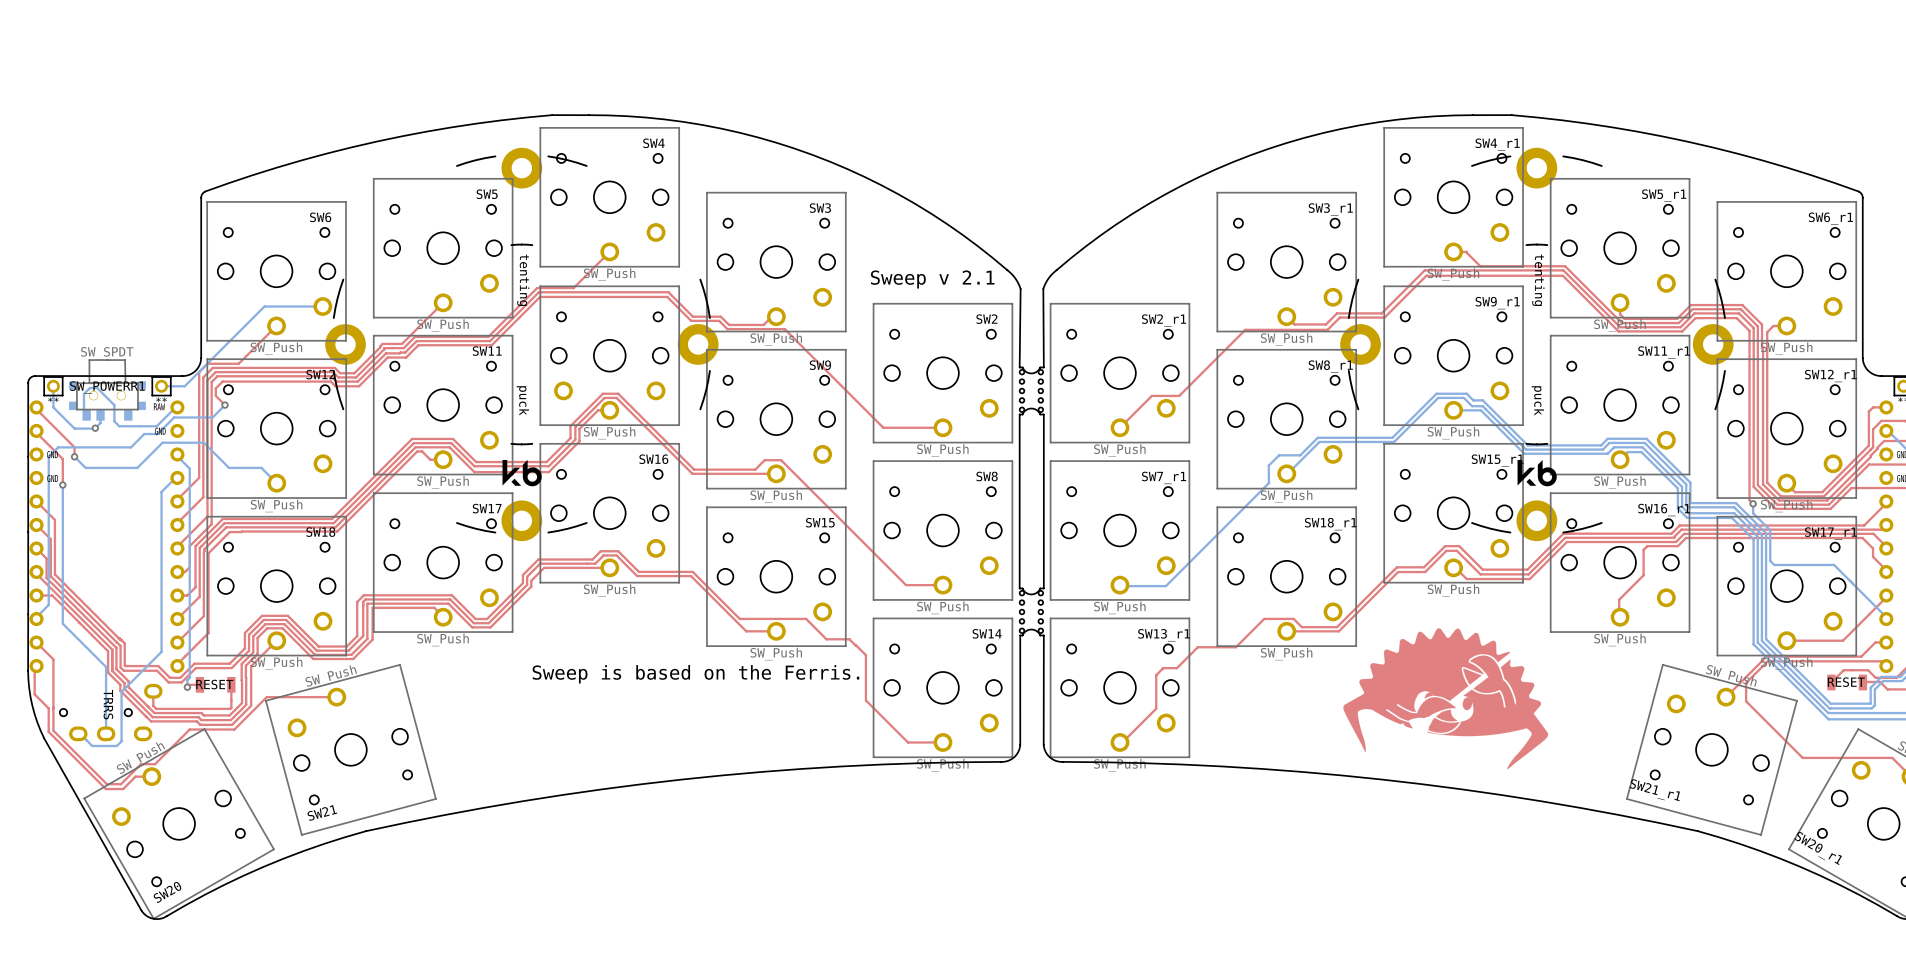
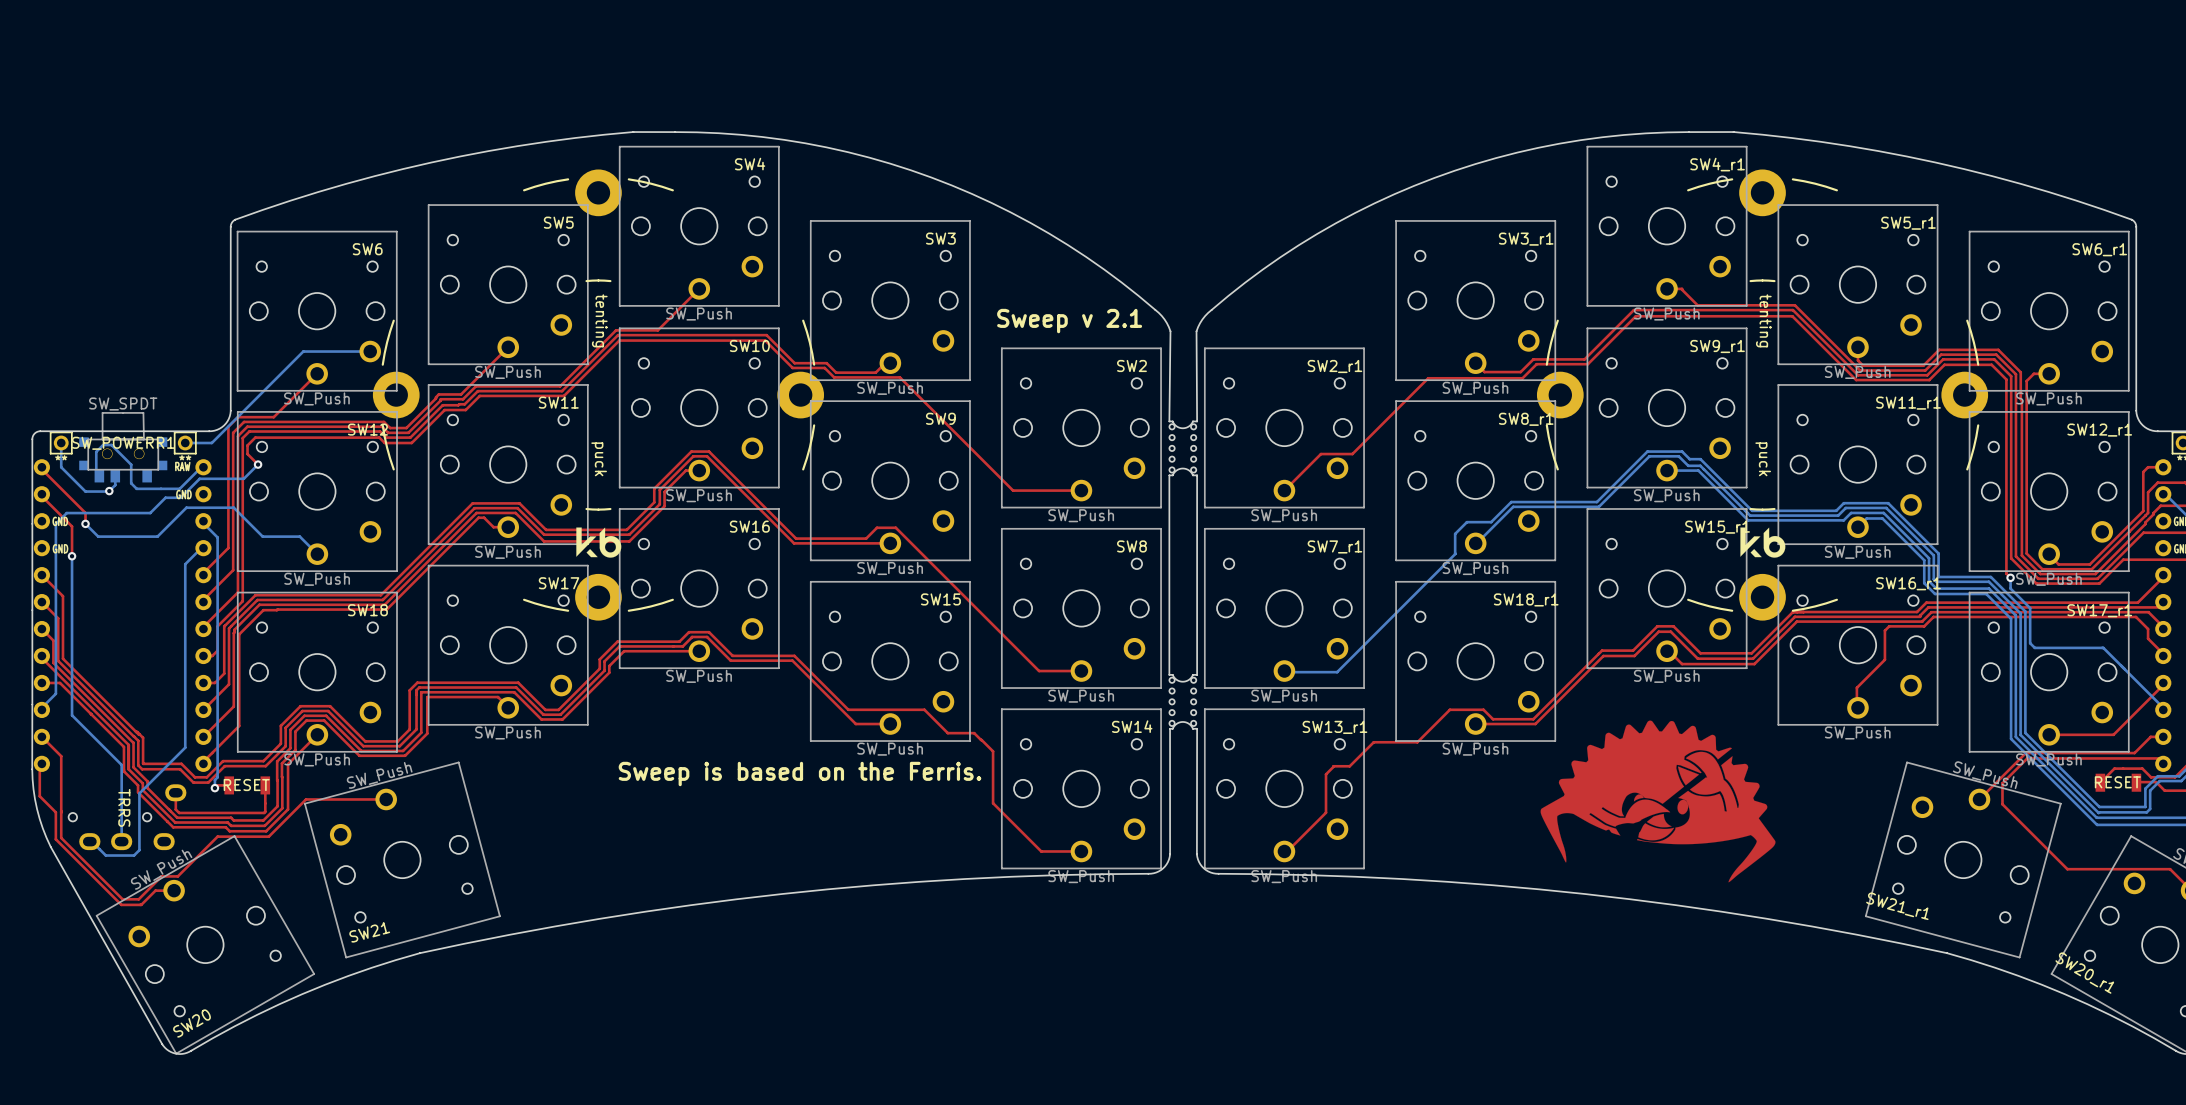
part: SW_Push (609, 355) -> none
SW10: none -> SW_Push (699, 407)

